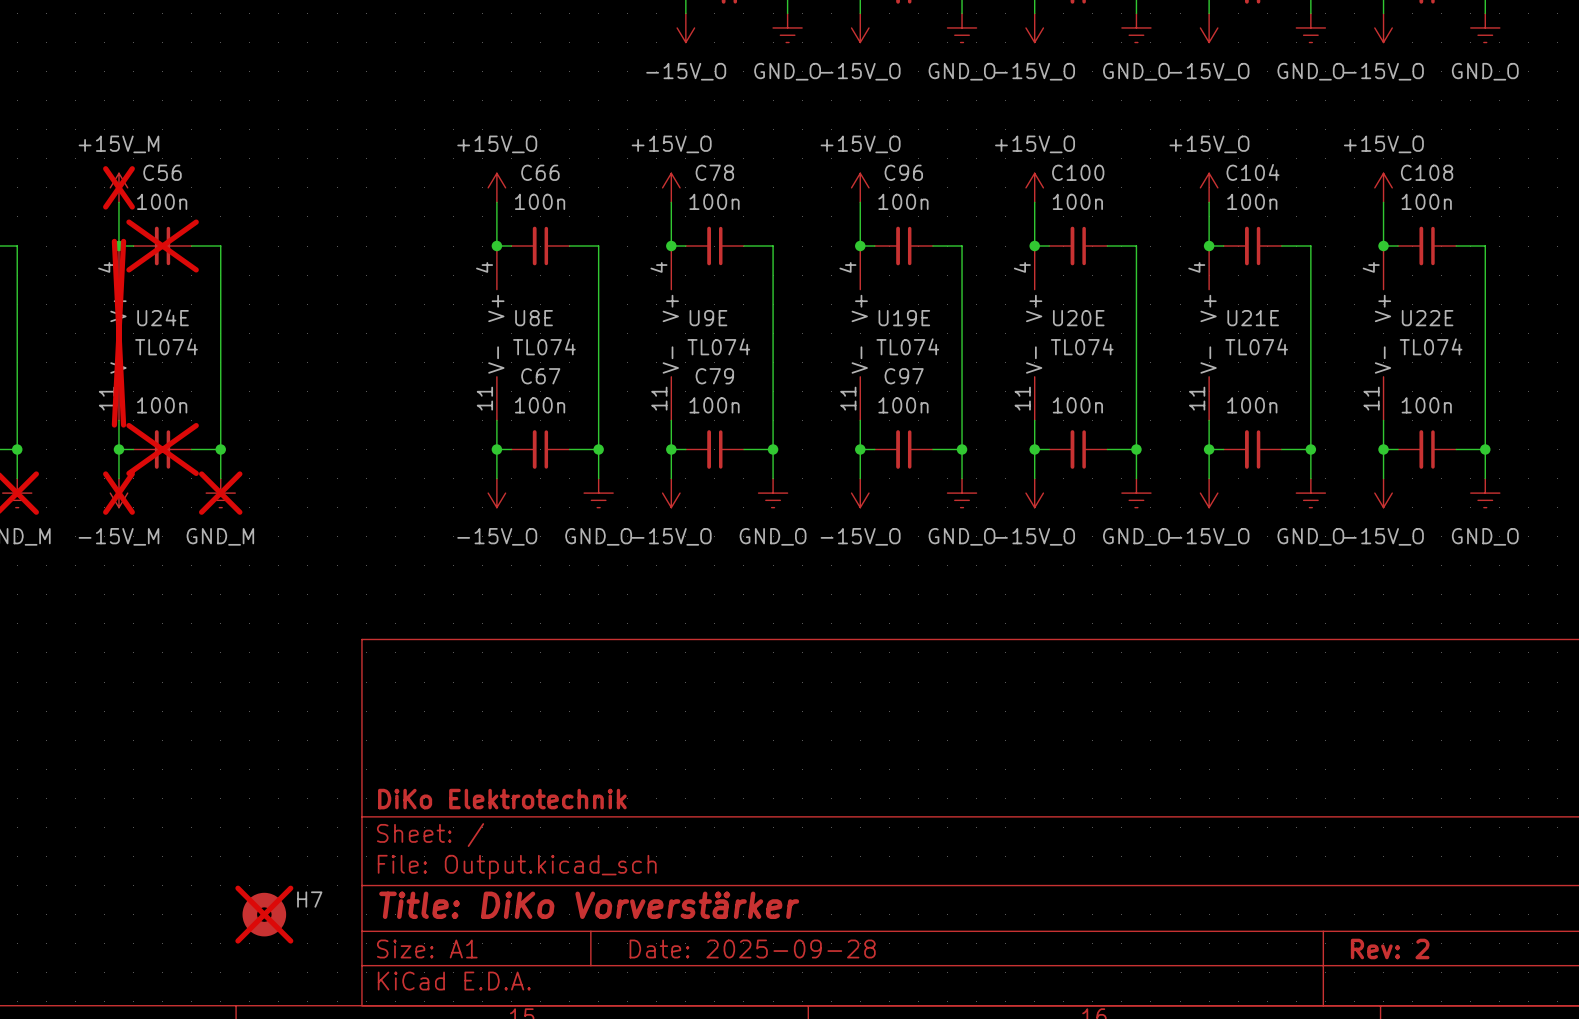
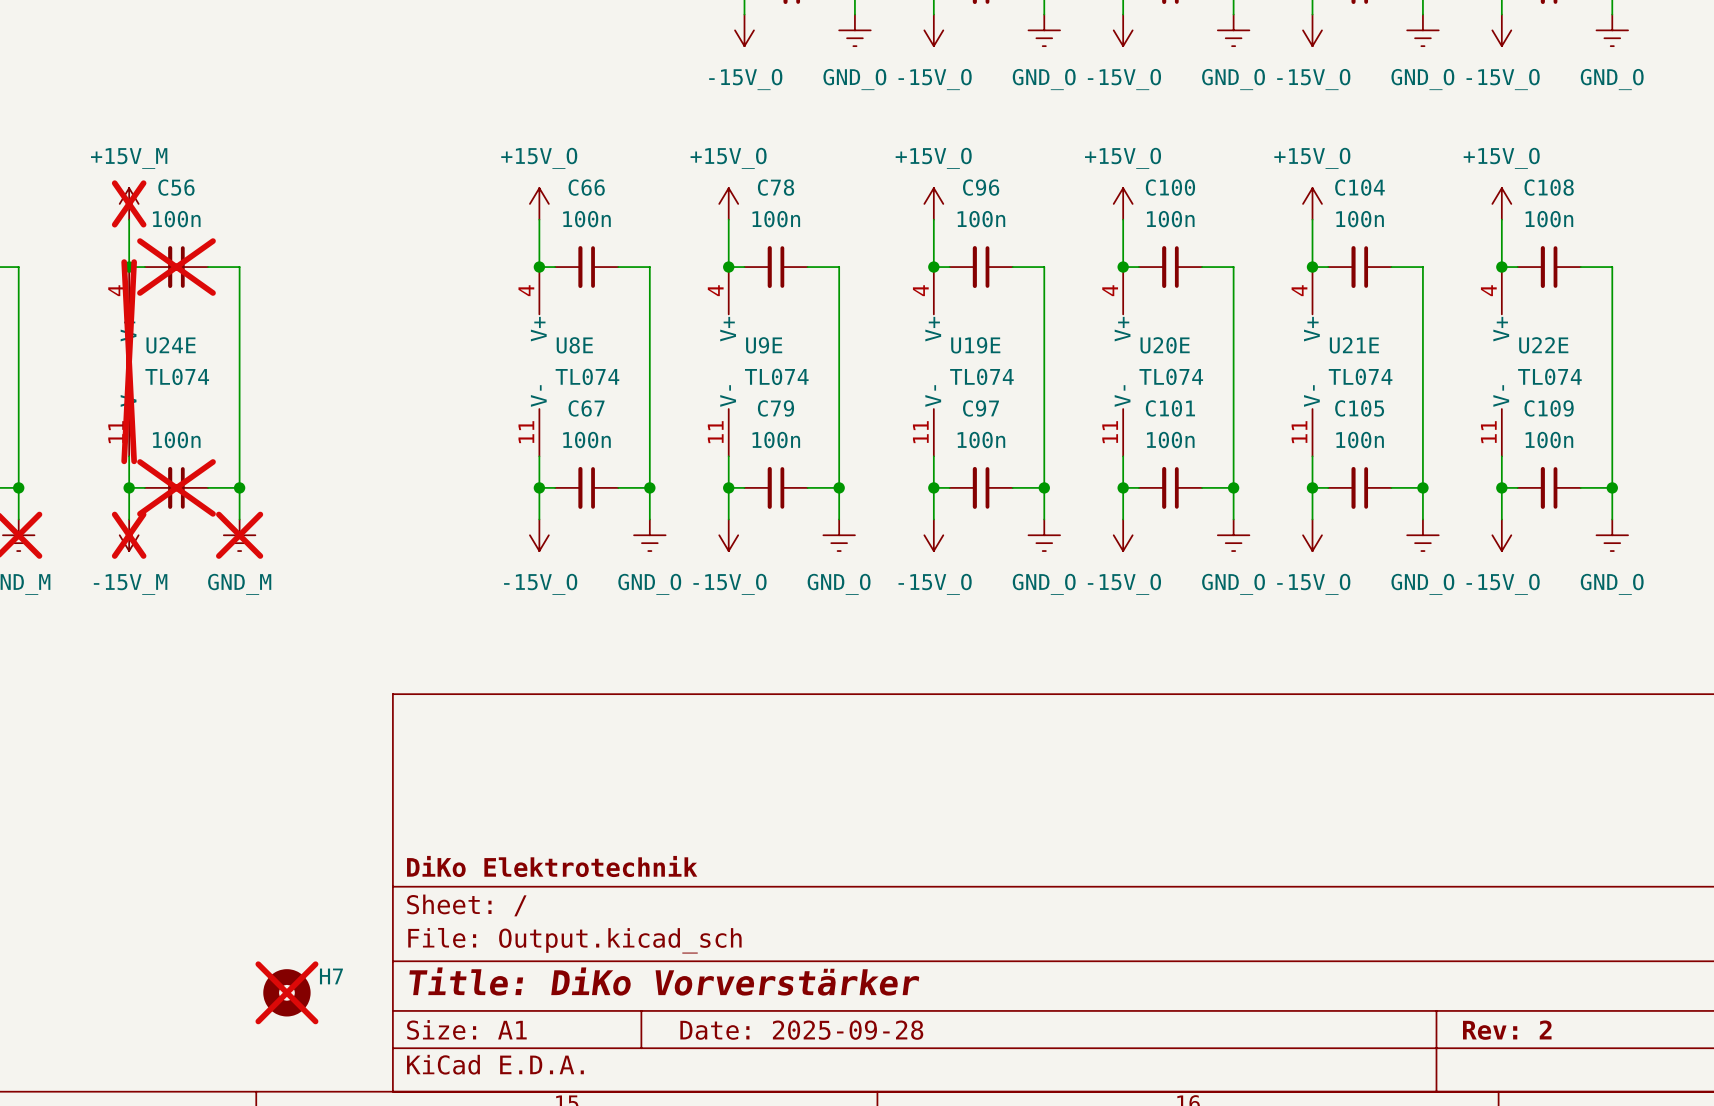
C101 name: none -> C101 (1170, 408)
C105 name: none -> C105 (1359, 408)
C109 name: none -> C109 (1549, 408)

